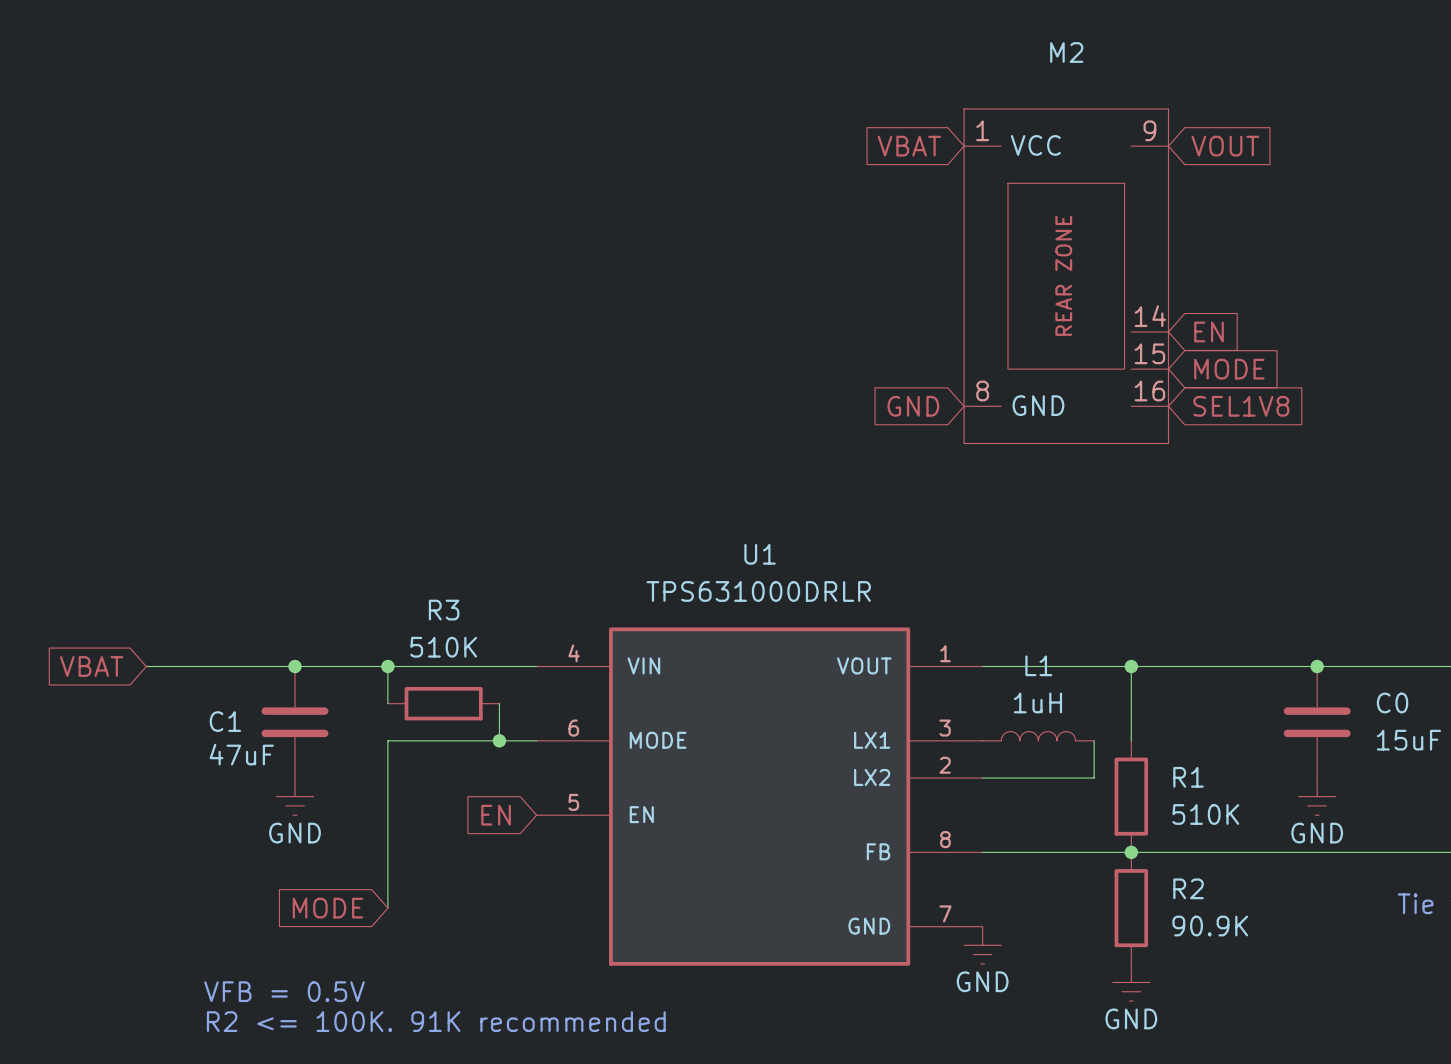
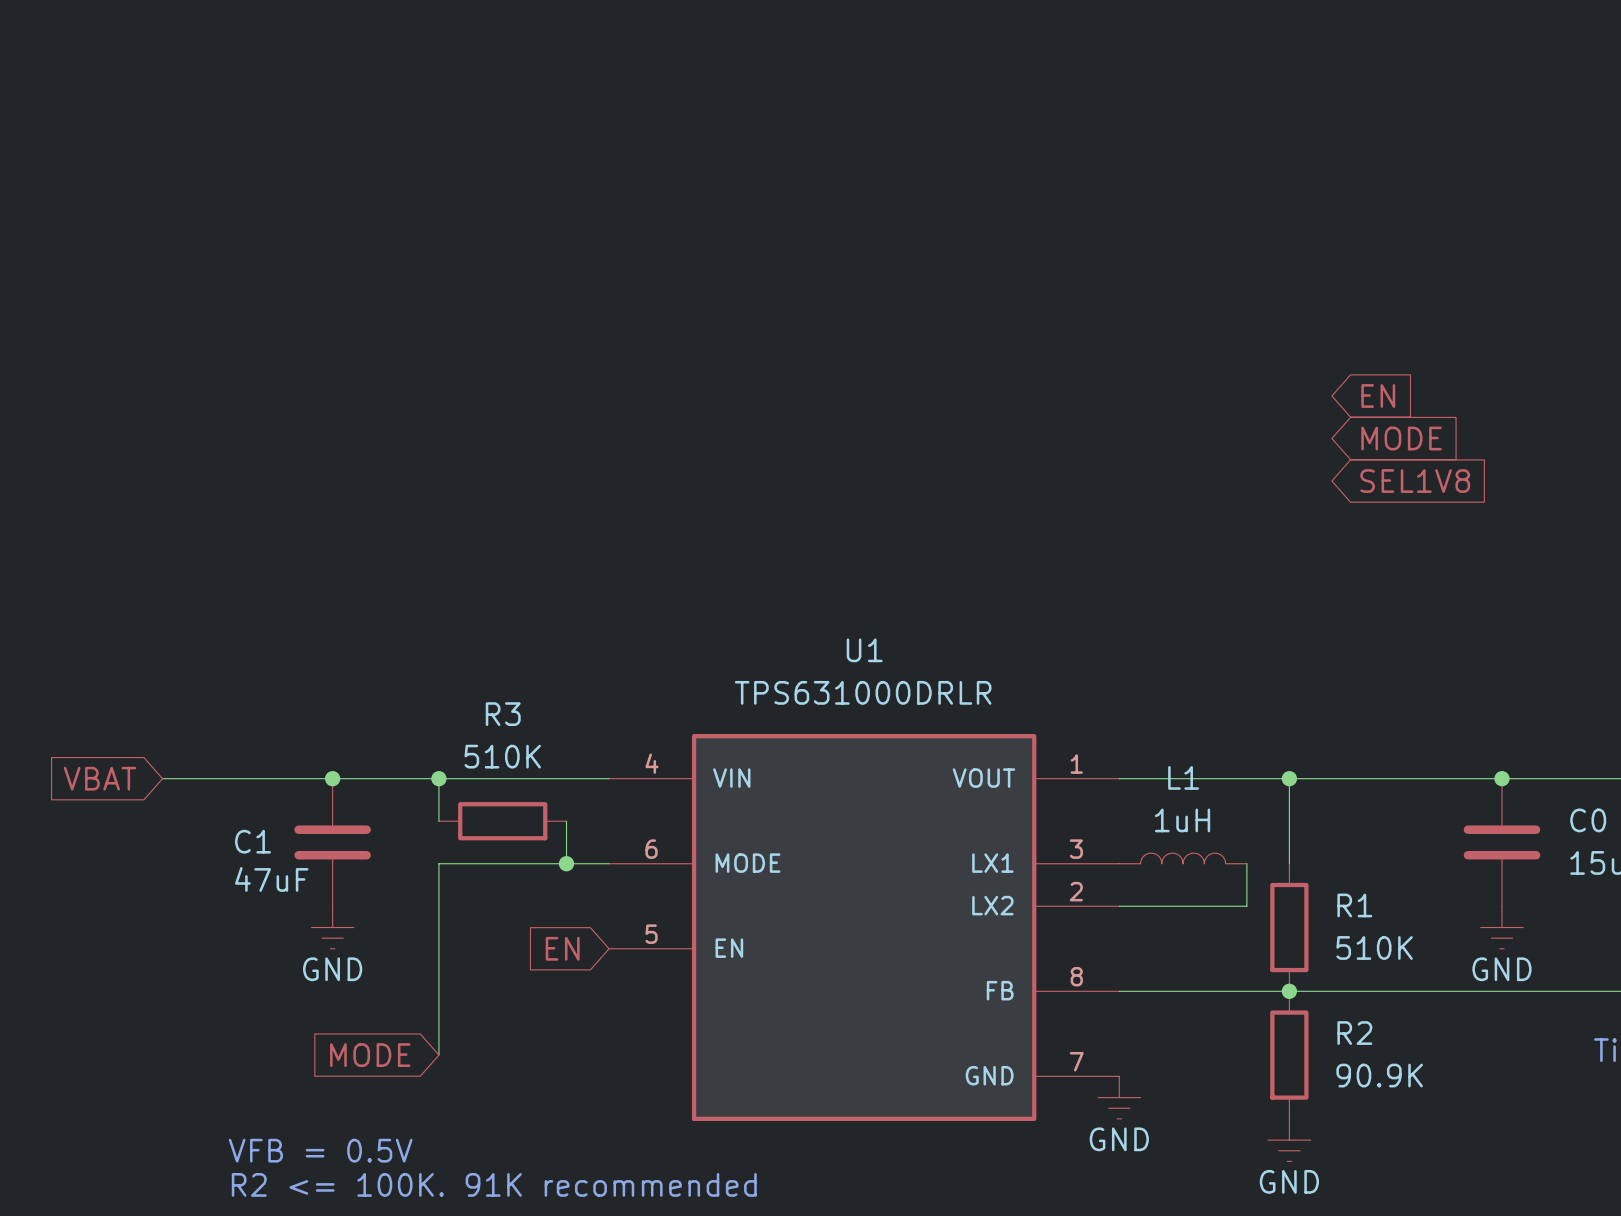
global label: VBAT (909, 146) -> none
global label: VOUT (1225, 146) -> none
M2: (1066, 276) -> none
global label: GND (913, 406) -> none

